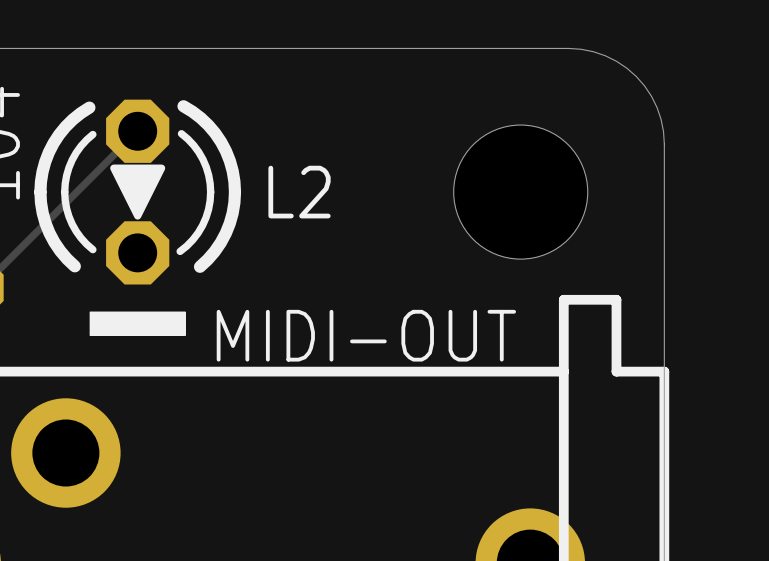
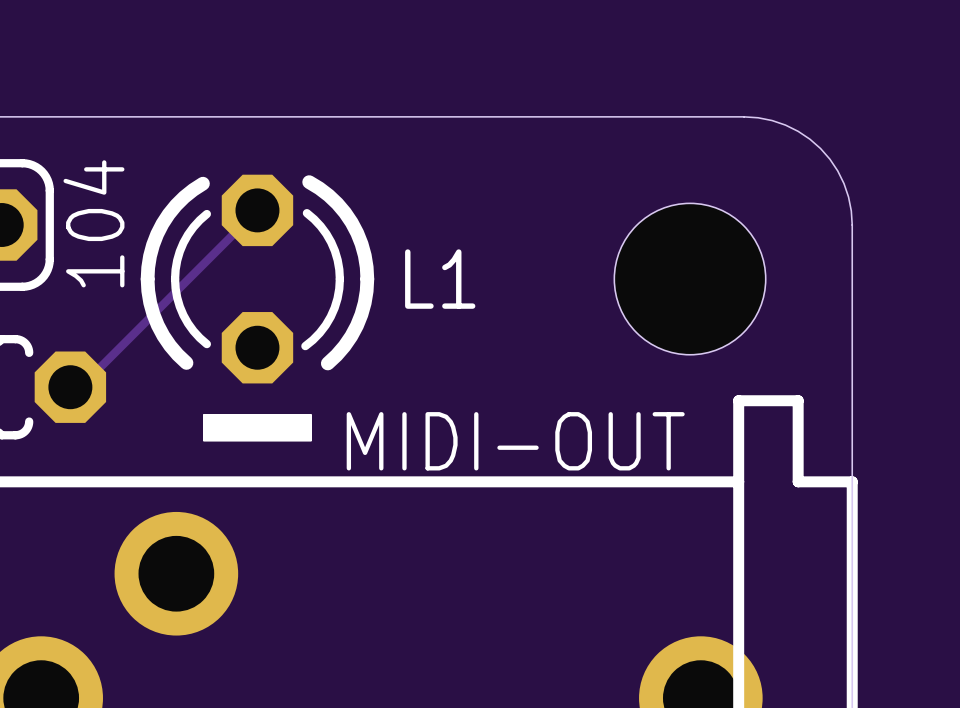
drawing: [110, 164, 166, 220] -> none
L2 name: L2 (299, 192) -> L1 (440, 279)

